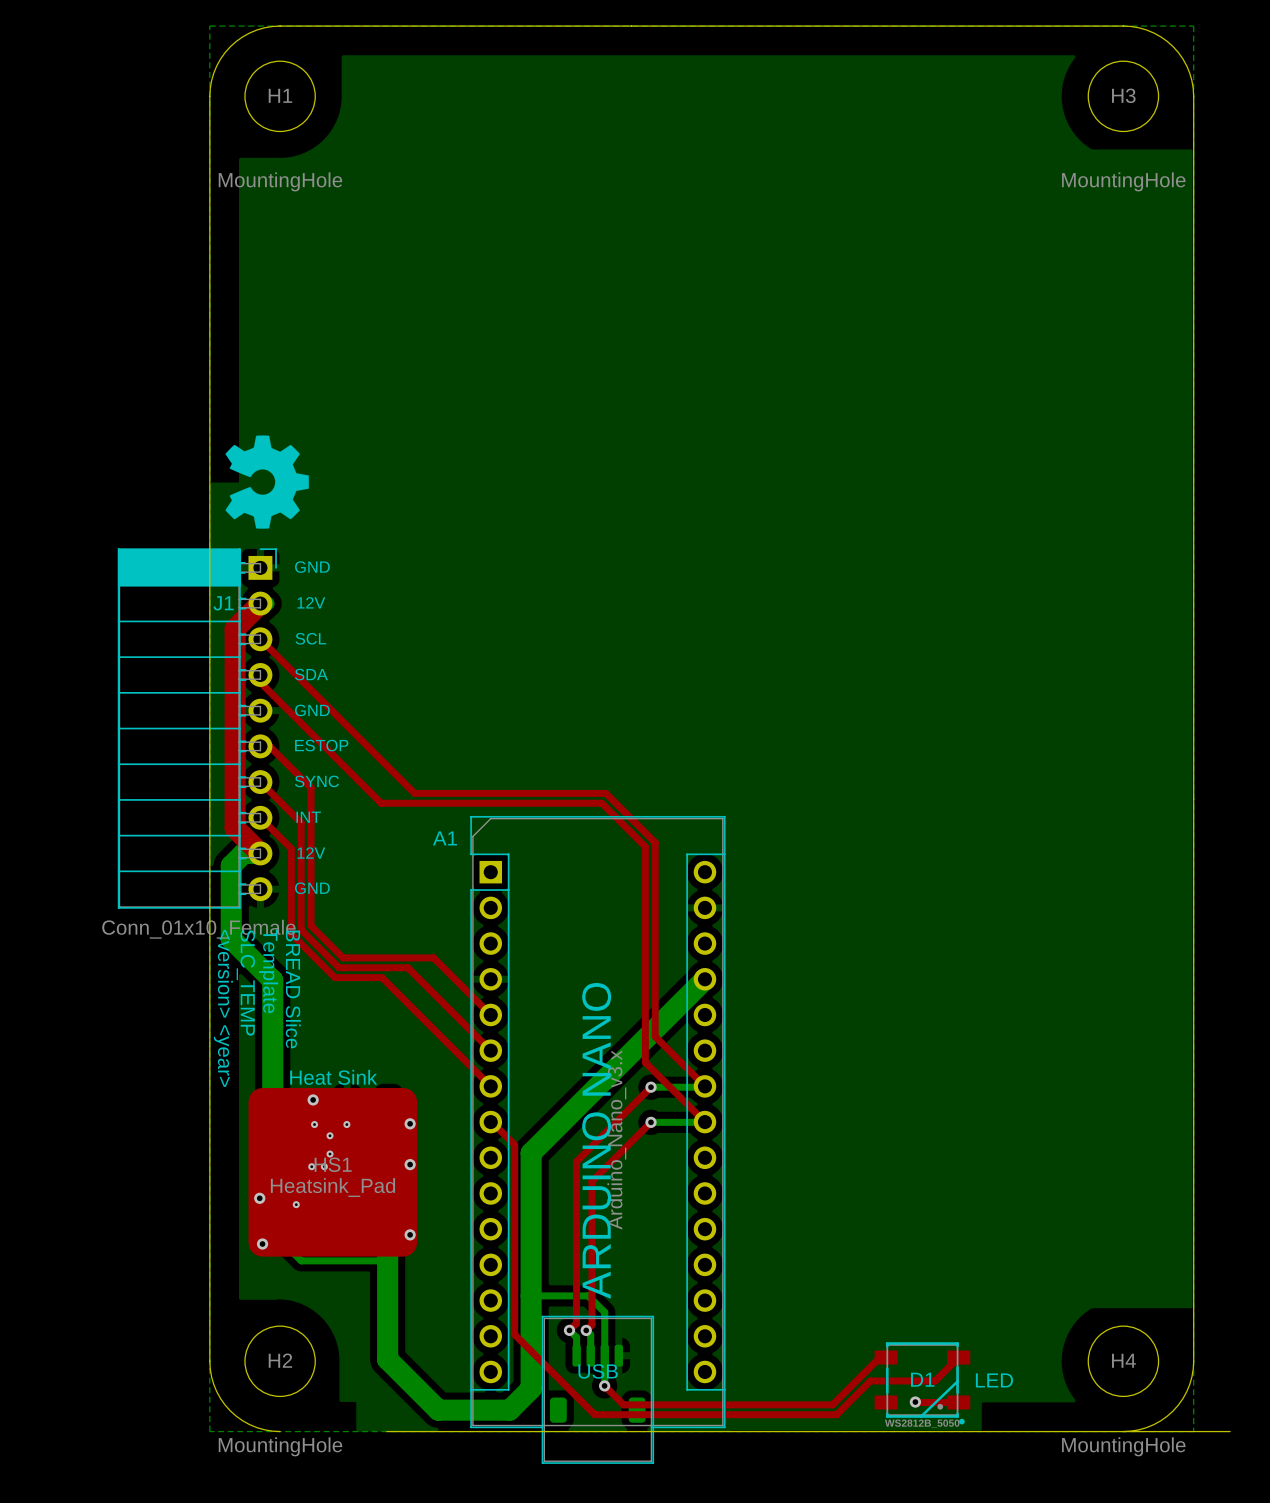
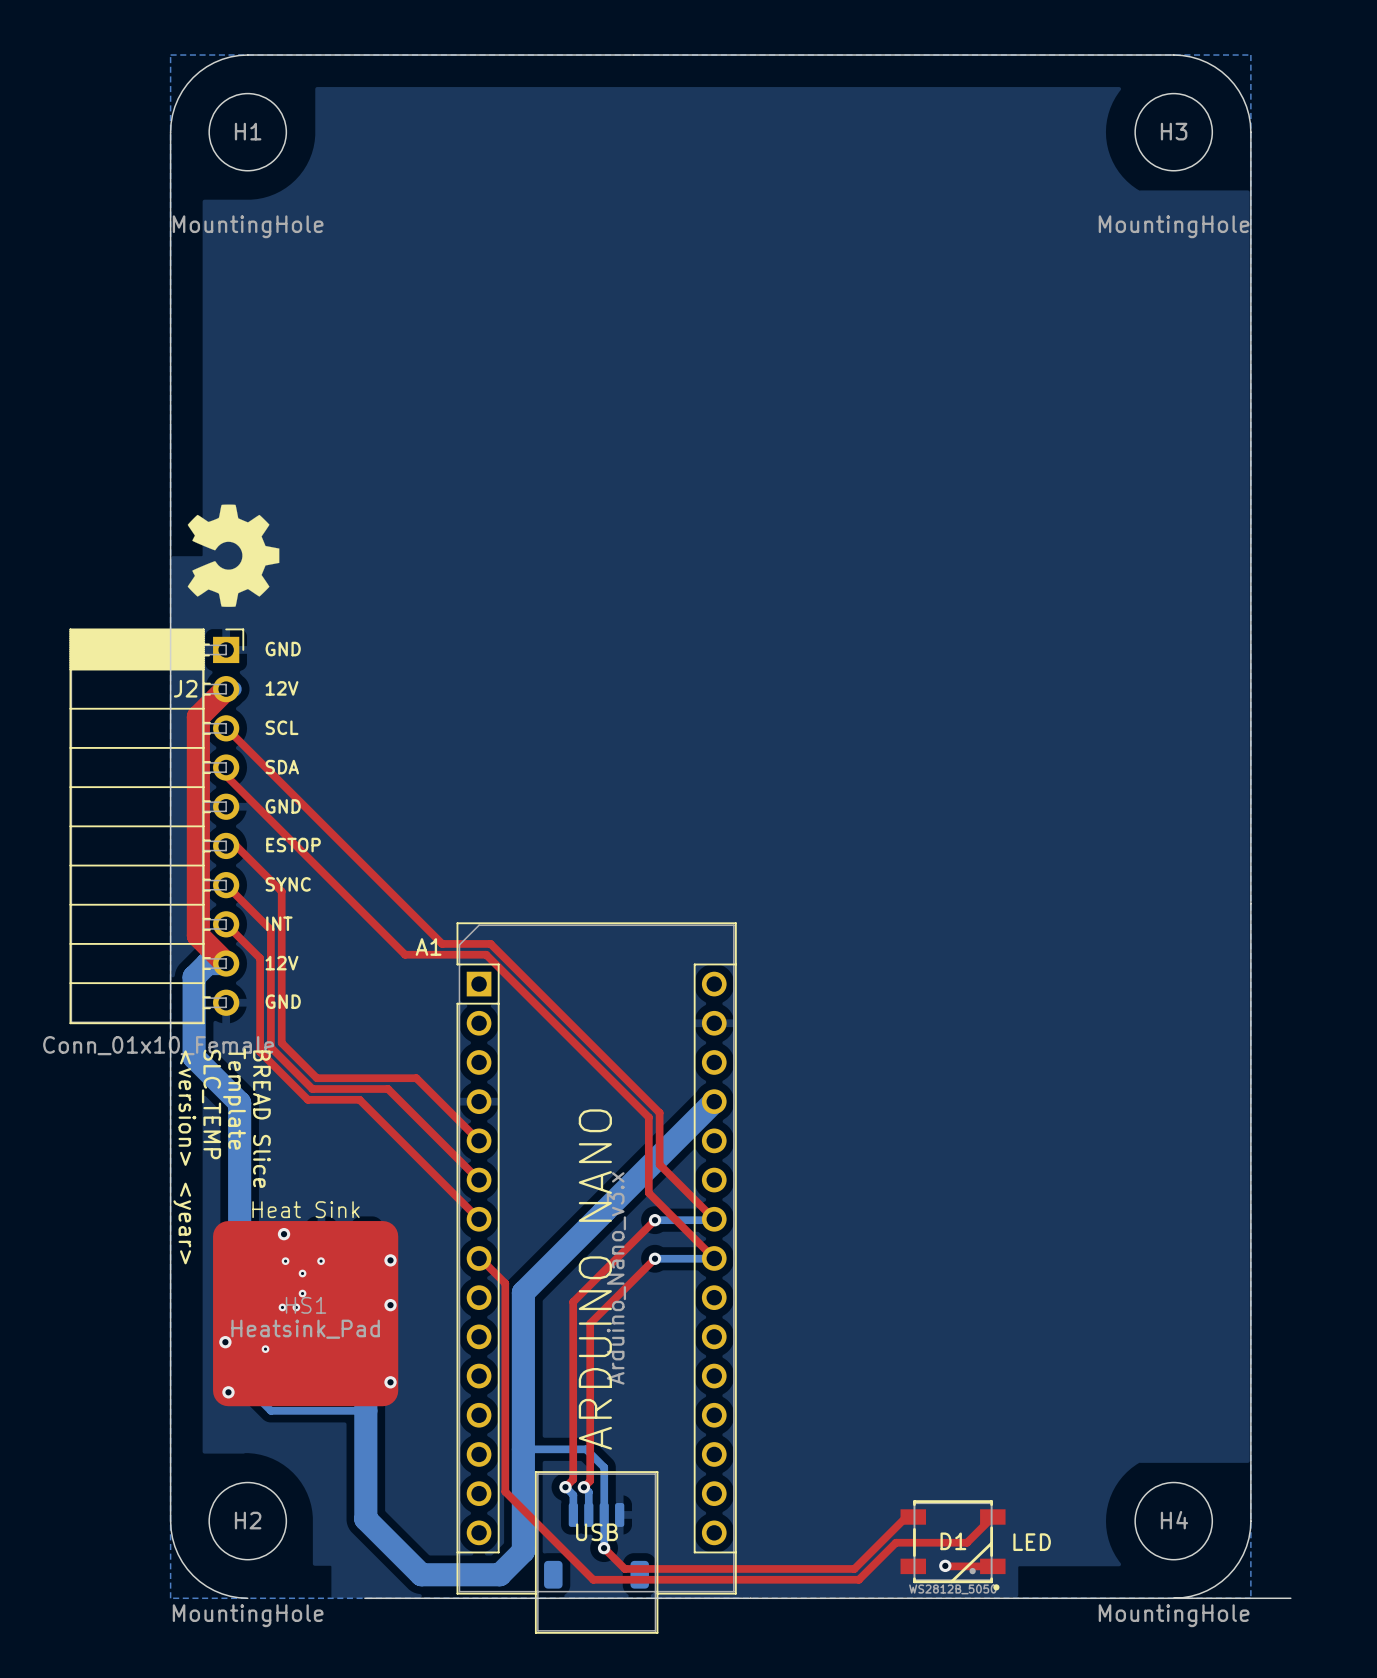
J1 name: J1 (223, 603) -> J2 (185, 688)
top track: (260, 639) (414, 793) (605, 793) (655, 842) (655, 989) -> (226, 728) (442, 943) (490, 943) (659, 1112)
top track: (381, 803) (601, 803) (645, 846) (645, 993) -> (358, 908) (405, 954) (486, 954) (648, 1117)

